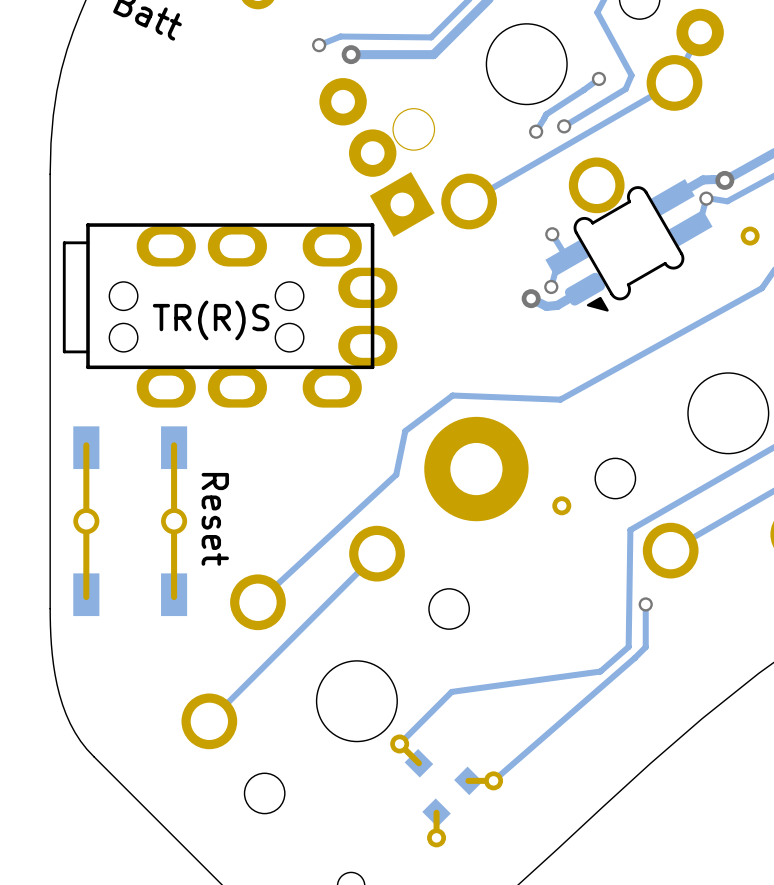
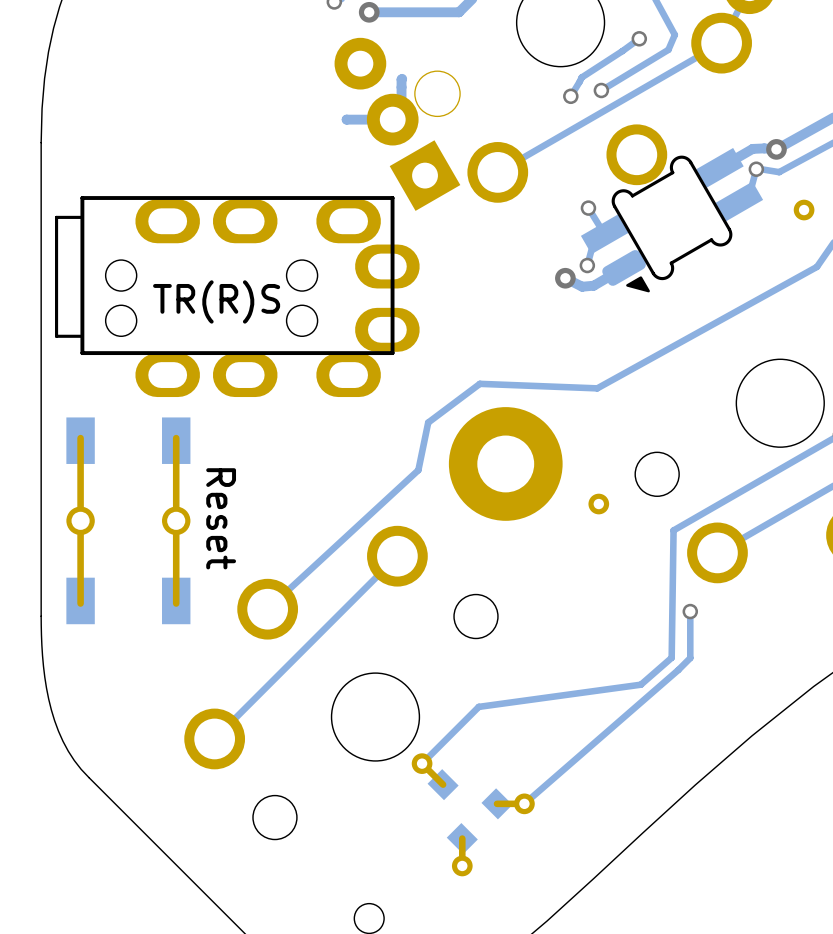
track: none -> (402, 78) (401, 110) (392, 119) (346, 119)

